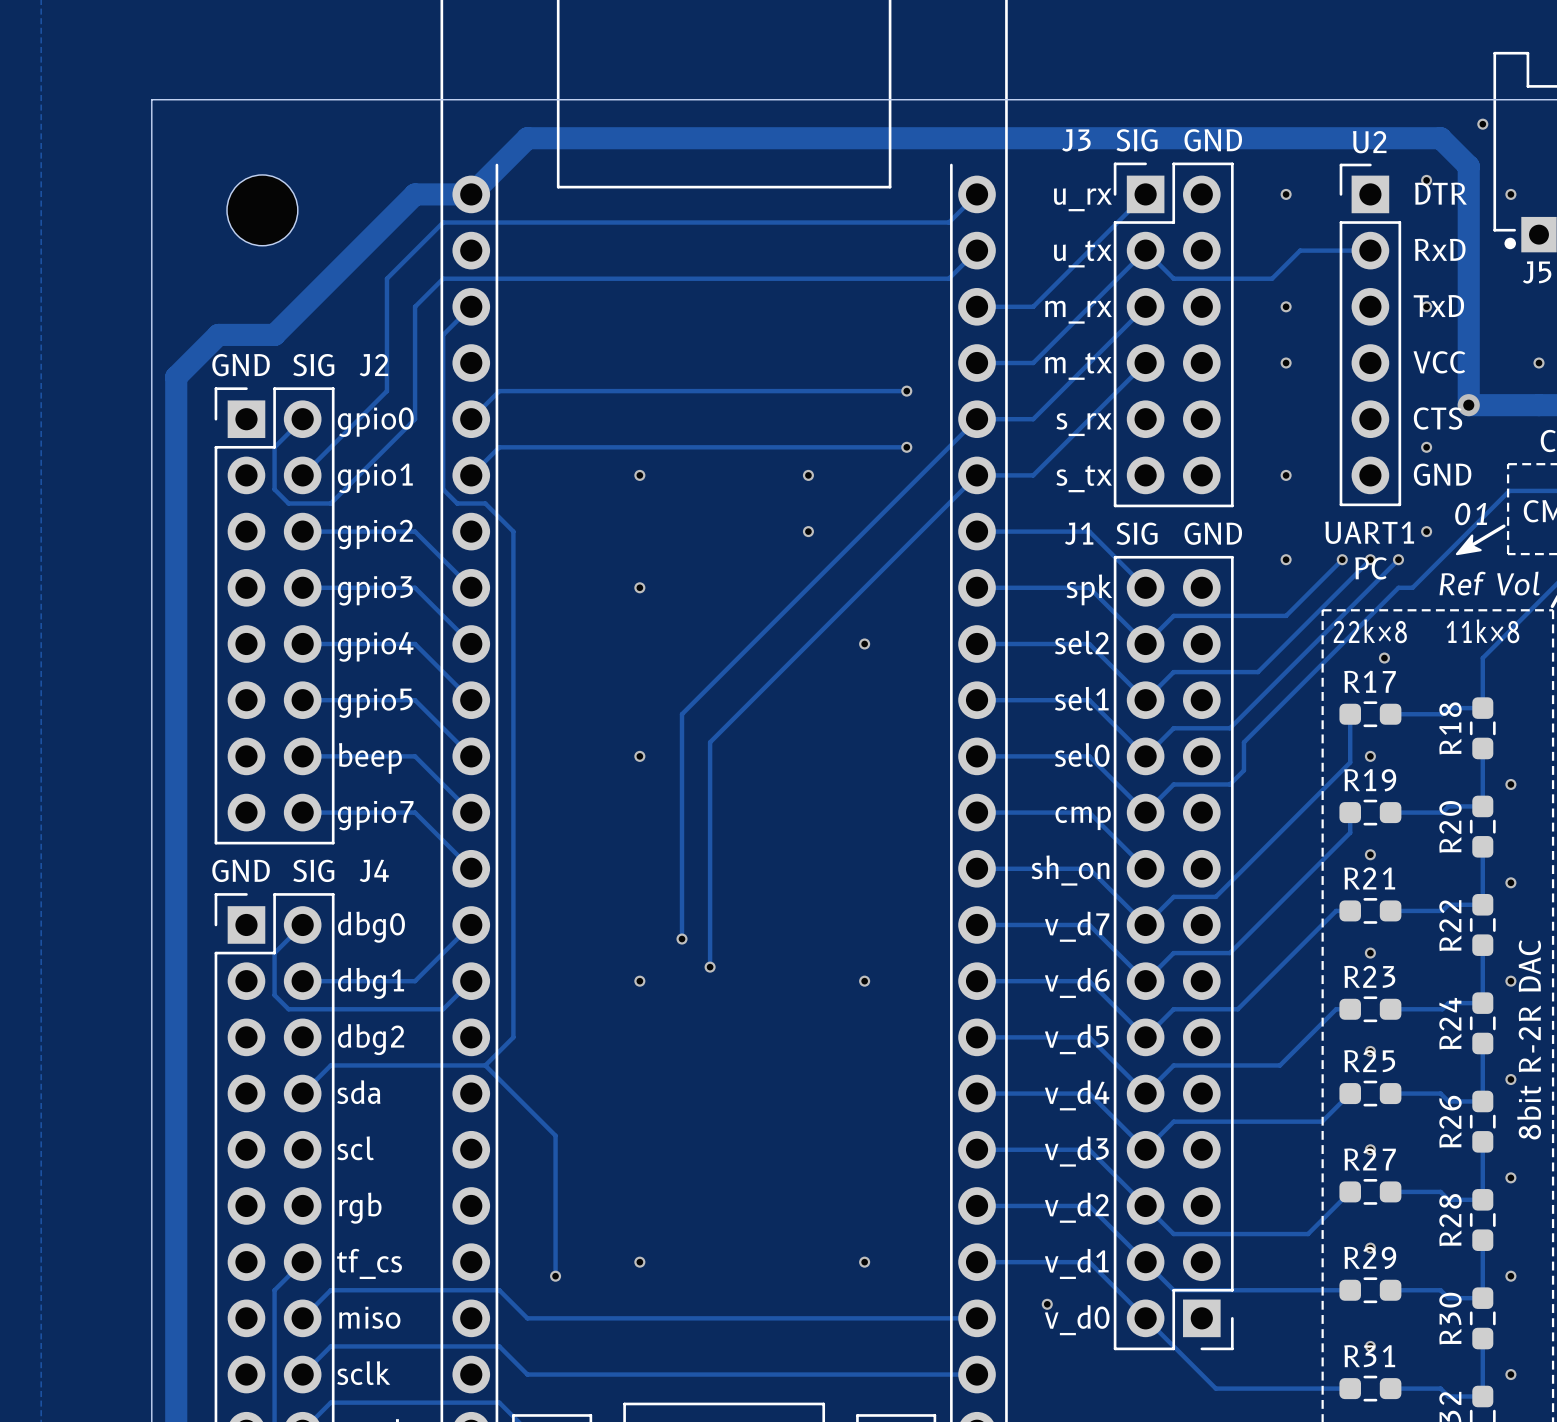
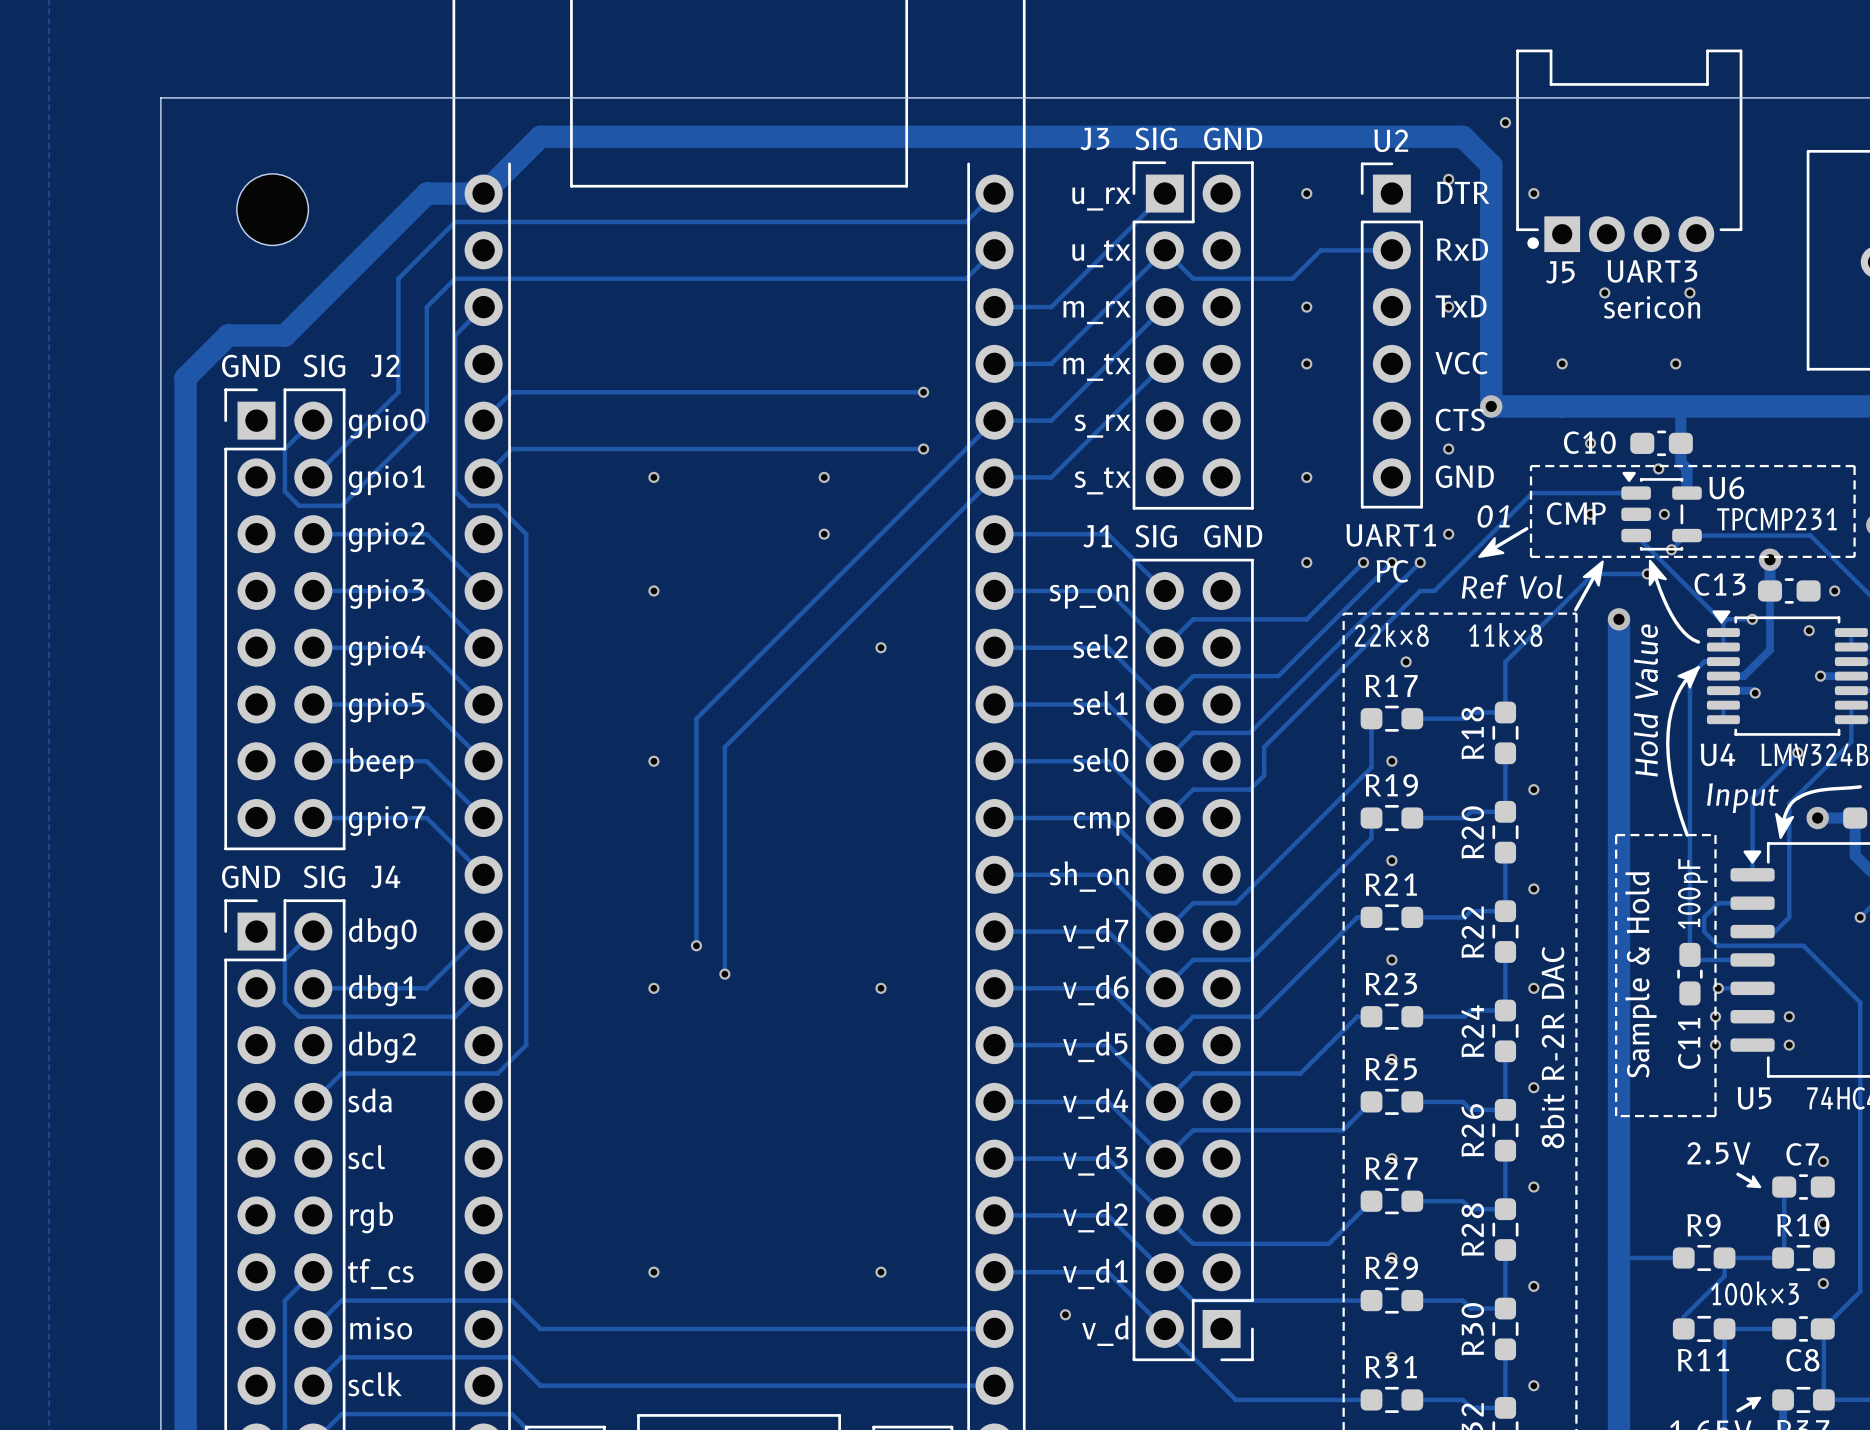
text: spk (1089, 589) -> sp_on (1088, 596)
track: (485, 1065) (555, 1135) (555, 1276) -> none
via: (555, 1276) -> none
text: v_d0 (1077, 1320) -> v_d (1105, 1330)

